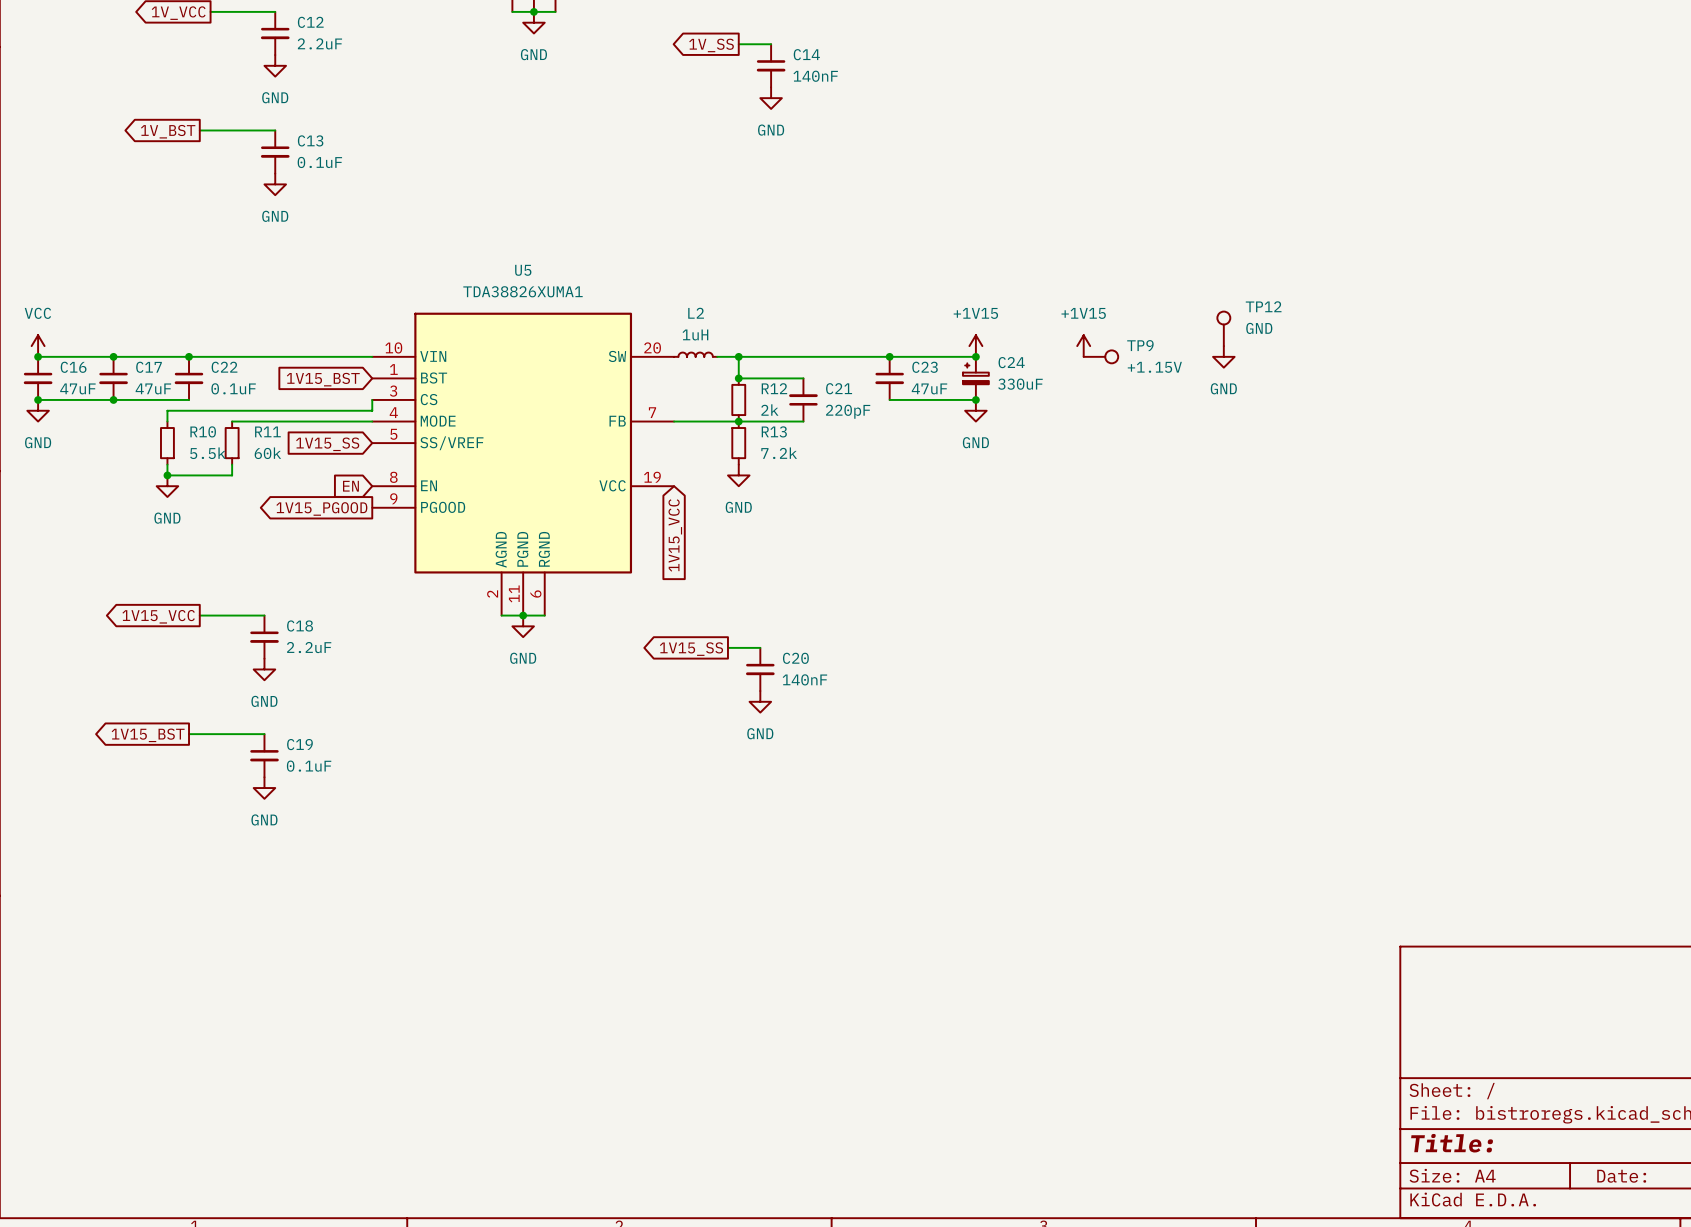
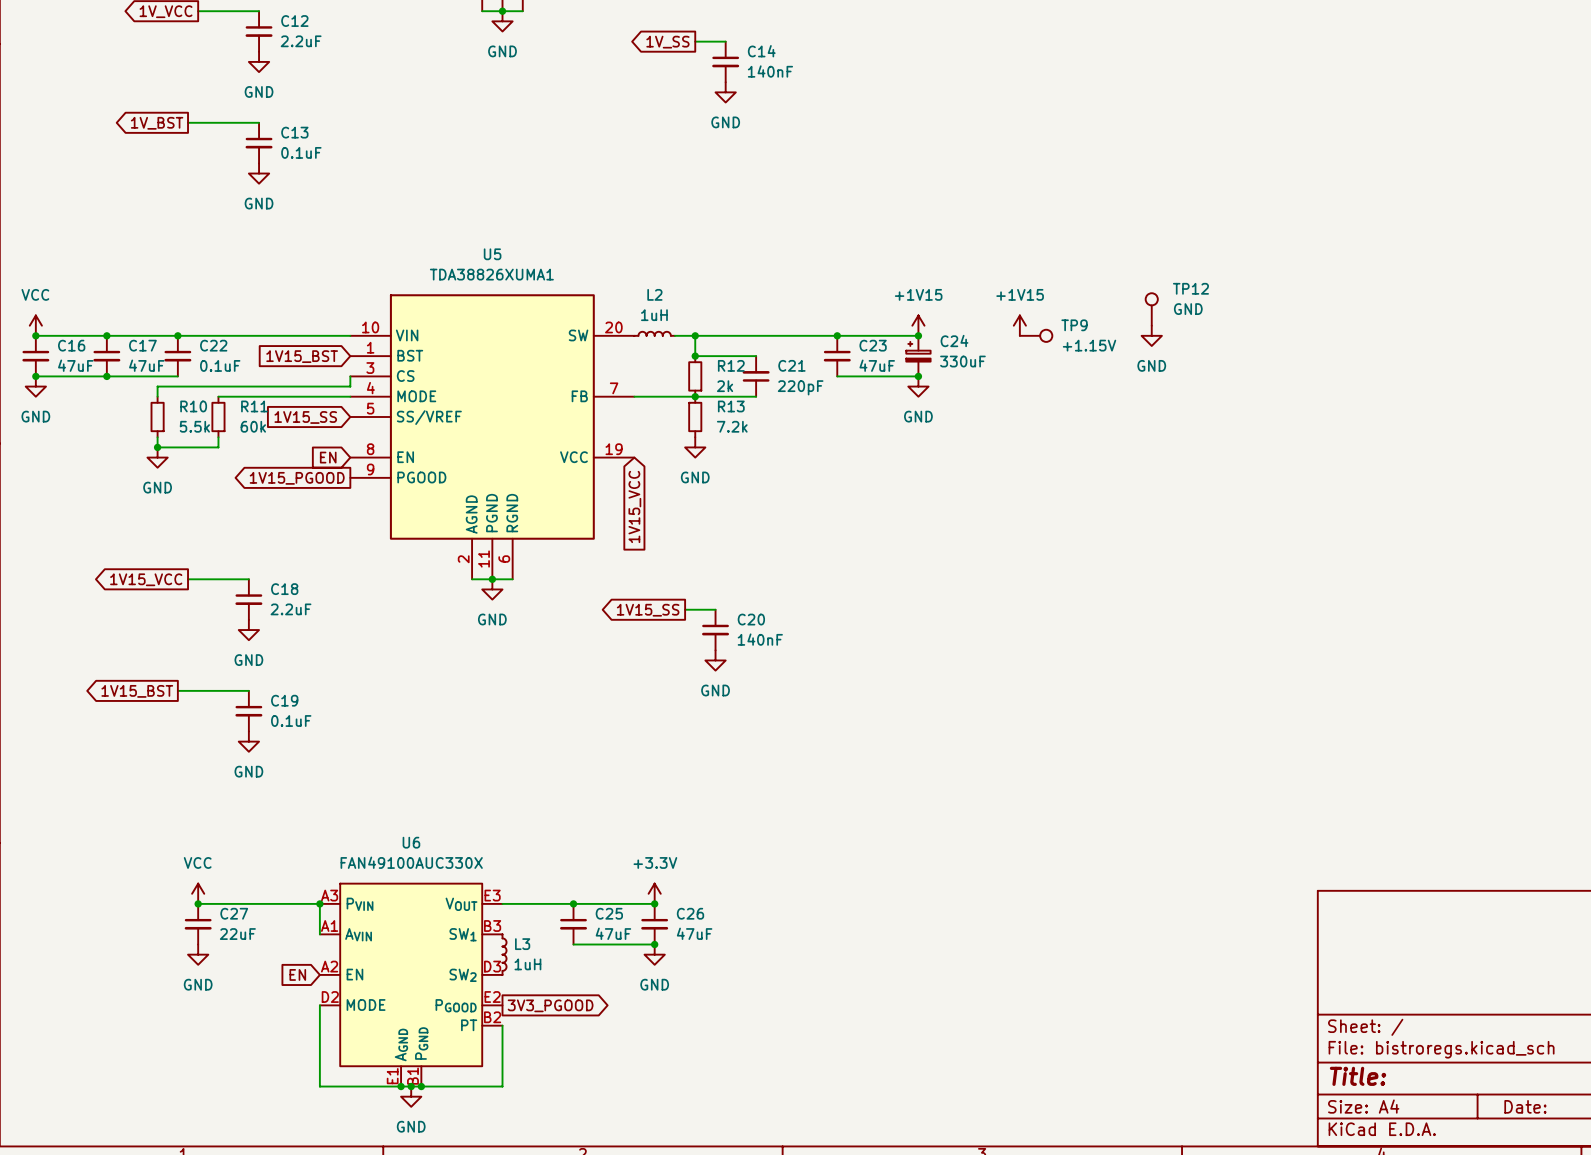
power symbol: none -> VCC (198, 893)
power symbol: none -> +3.3V (654, 893)
wire: none -> (198, 903) (319, 903) (319, 934)
junction: none -> (198, 903)
junction: none -> (319, 903)
wire: none -> (502, 903) (654, 903)
junction: none -> (573, 903)
junction: none -> (654, 903)
C27: none -> 22uF (198, 924)
C25: none -> 47uF (573, 924)
C26: none -> 47uF (654, 924)
wire: none -> (573, 944) (654, 944)
junction: none -> (654, 944)
power symbol: none -> GND (198, 954)
L3: none -> 1uH (504, 954)
power symbol: none -> GND (654, 954)
global label: none -> EN (297, 974)
U6: none -> FAN49100AUC330X (411, 985)
wire: none -> (319, 1005) (319, 1086) (502, 1086) (502, 1025)
global label: none -> 3V3_PGOOD (550, 1005)
junction: none -> (401, 1086)
junction: none -> (411, 1086)
junction: none -> (421, 1086)
power symbol: none -> GND (411, 1096)

